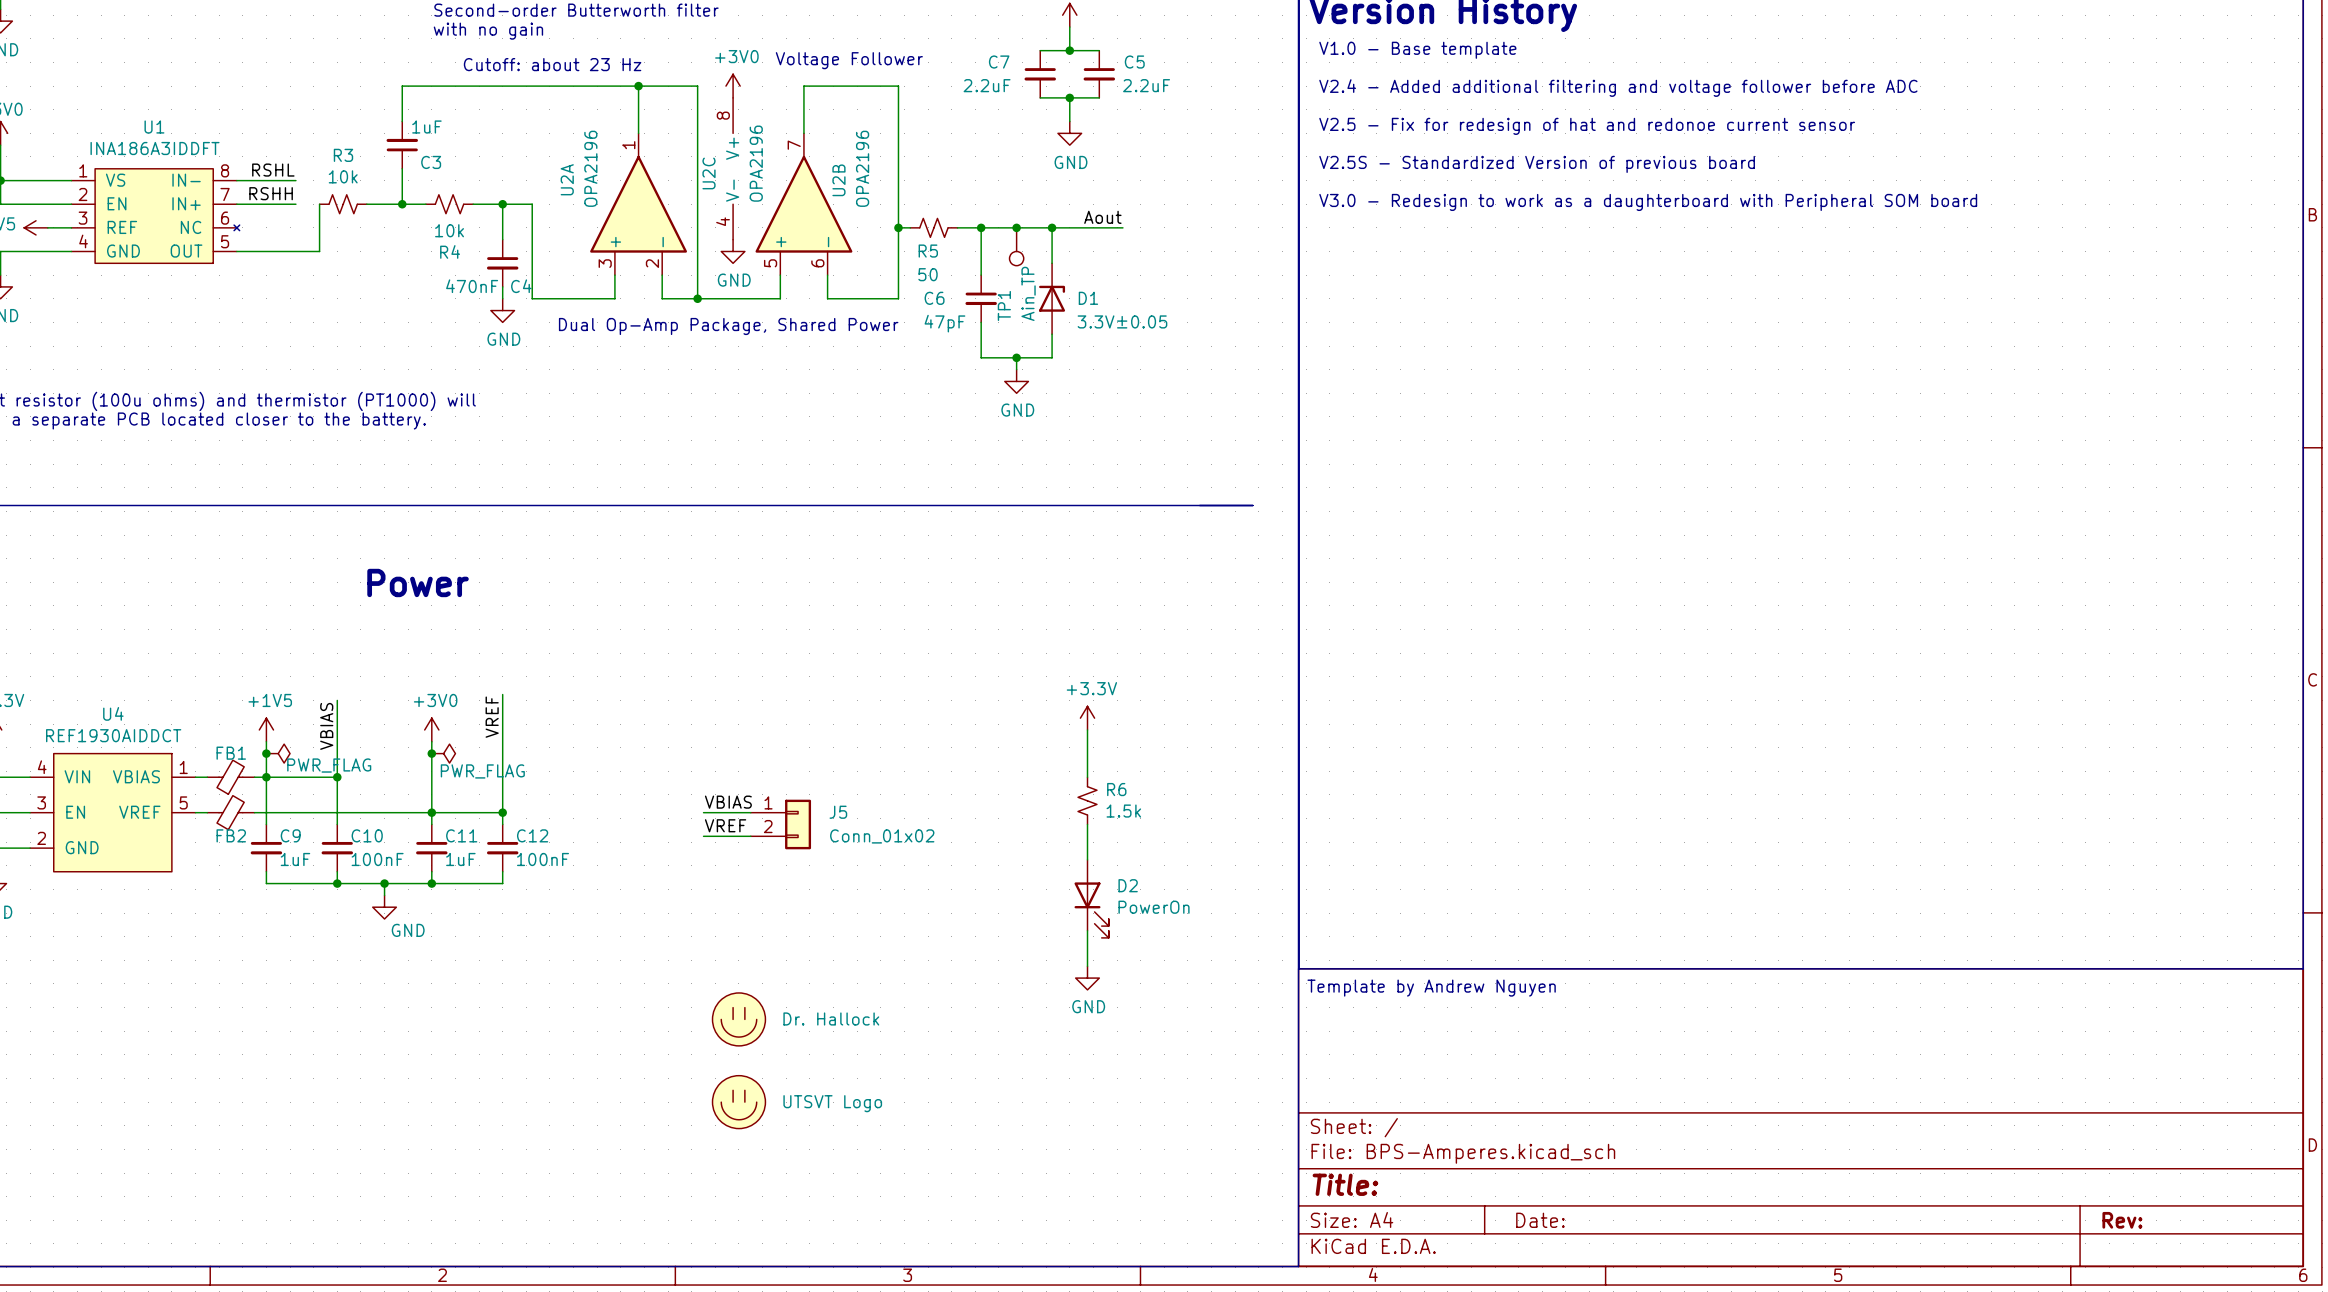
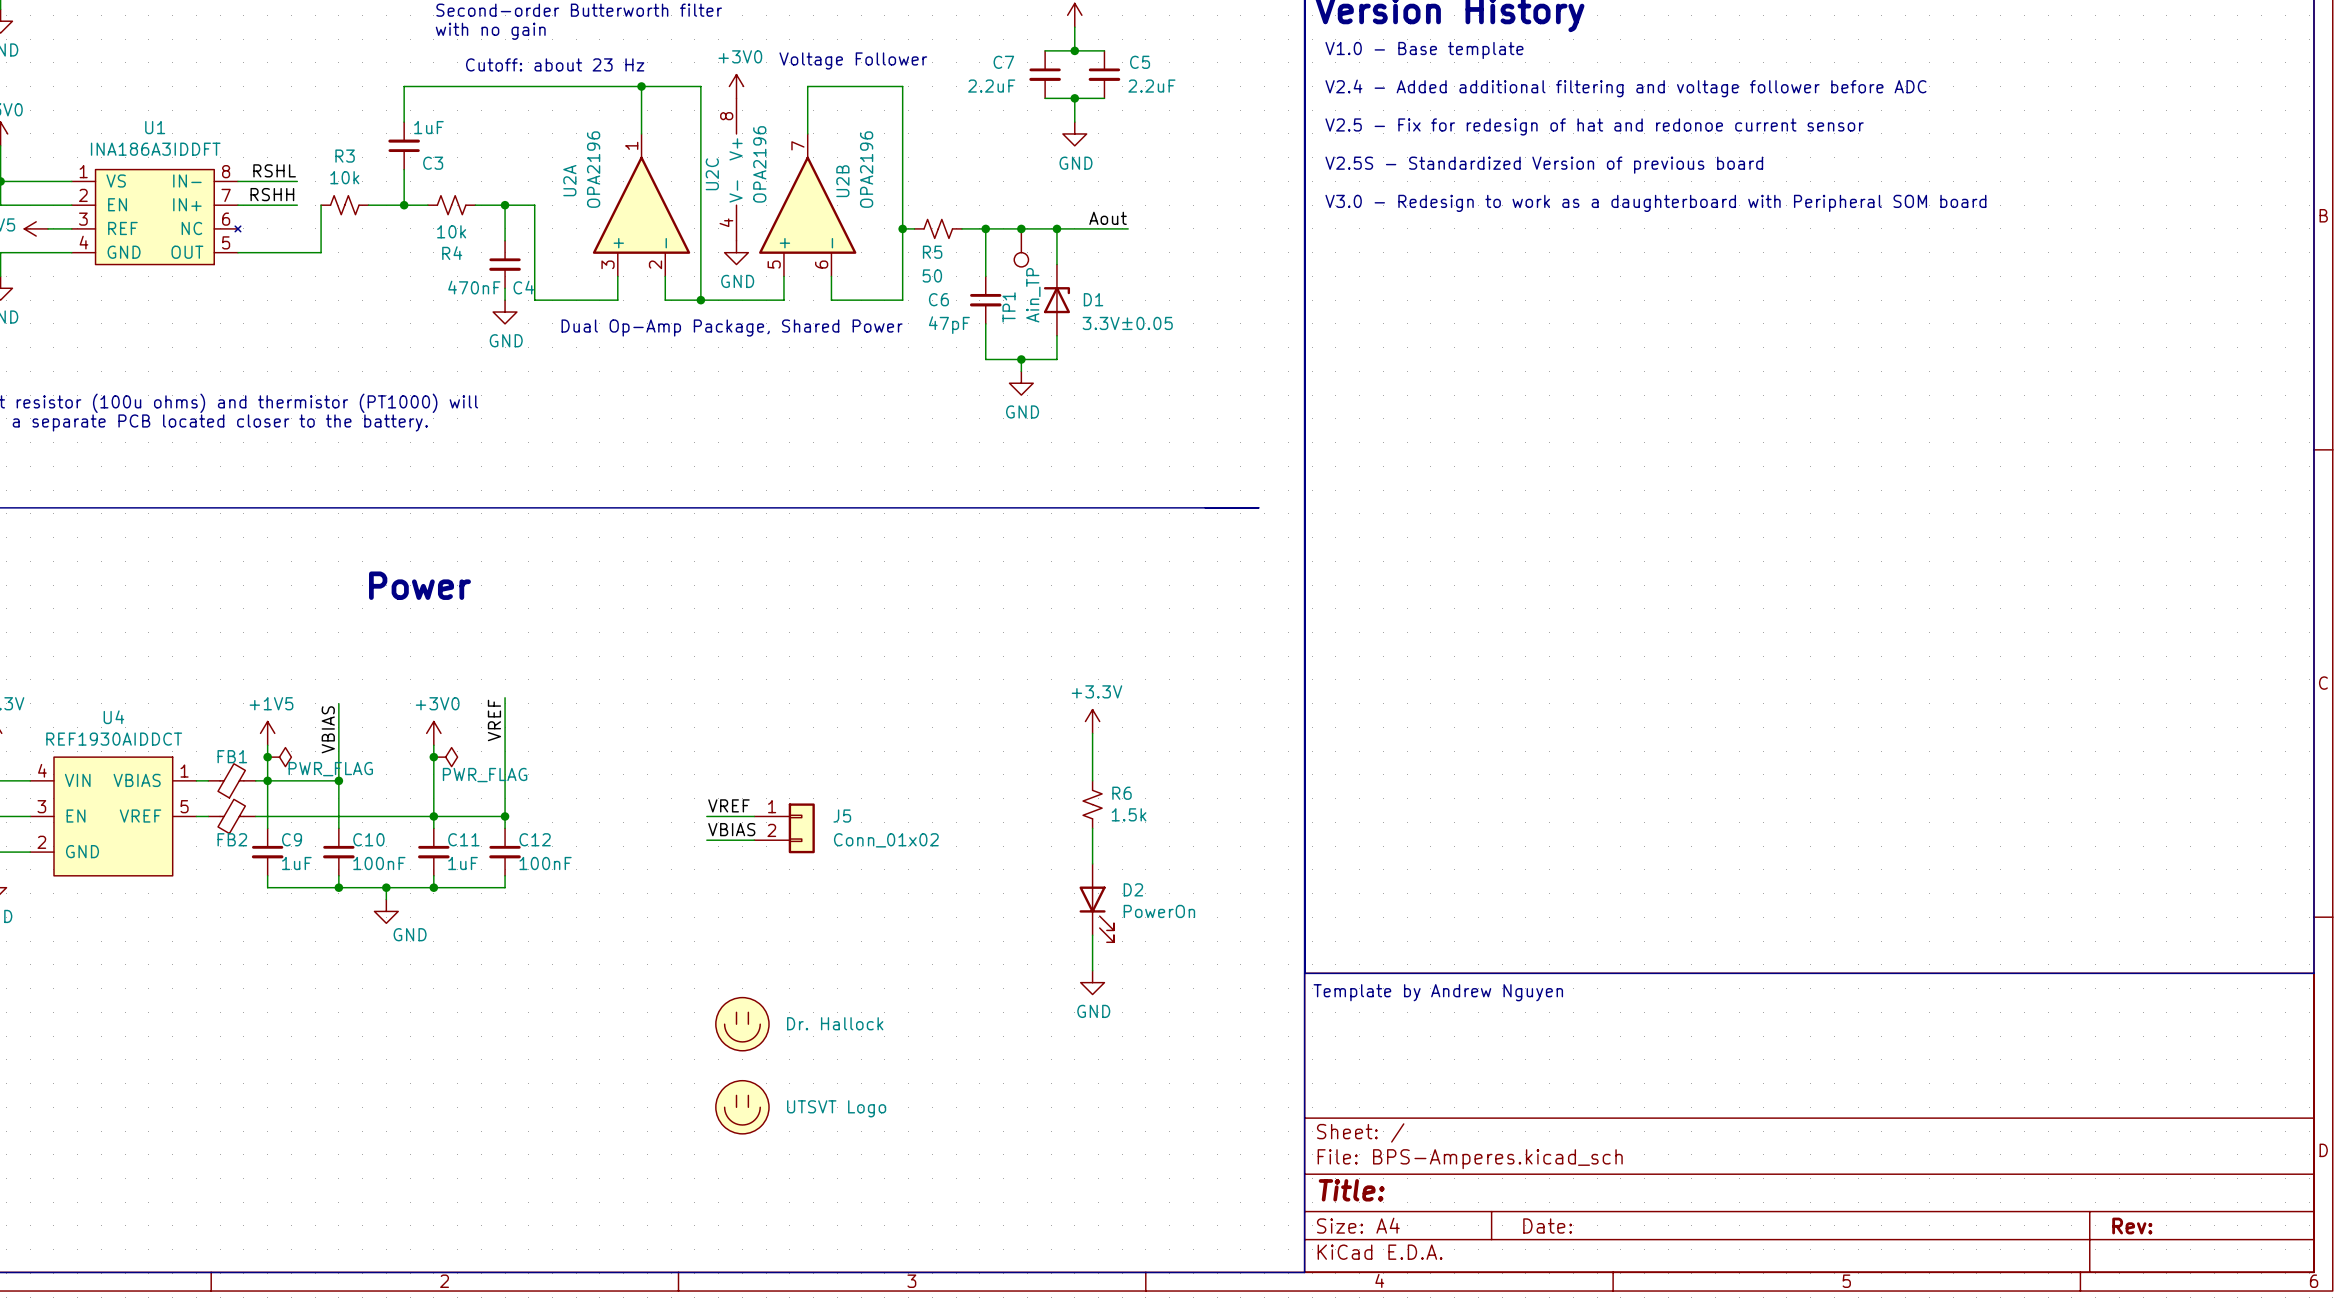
label: VBIAS (728, 802) -> VREF (728, 805)
label: VREF (725, 825) -> VBIAS (731, 829)

